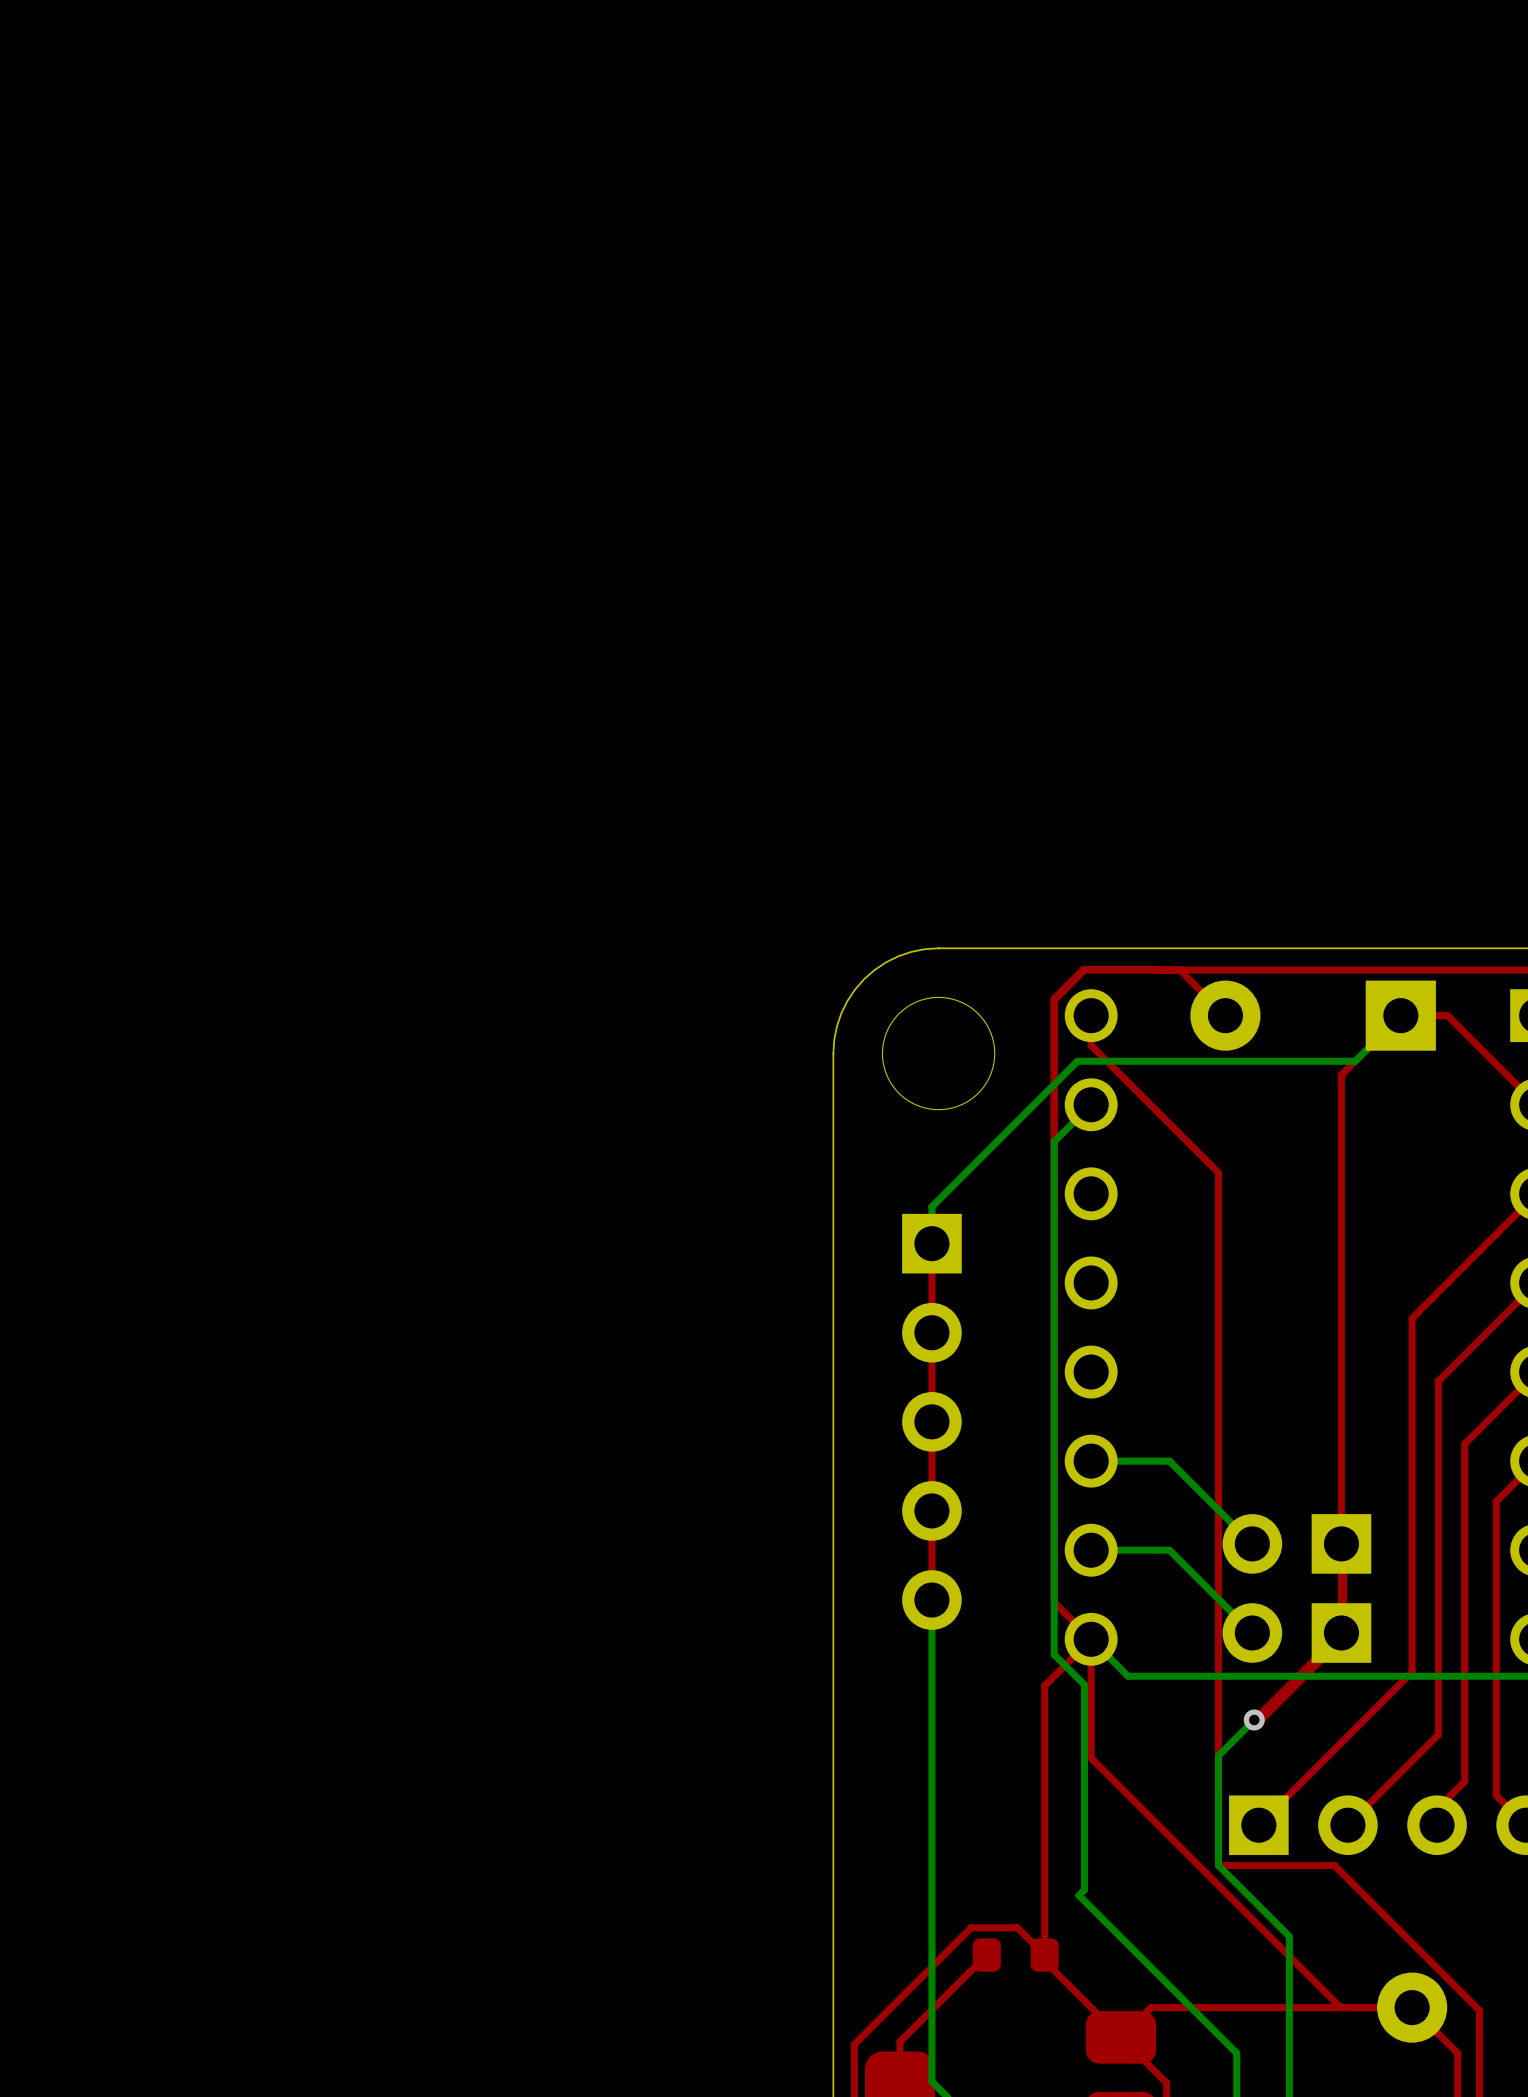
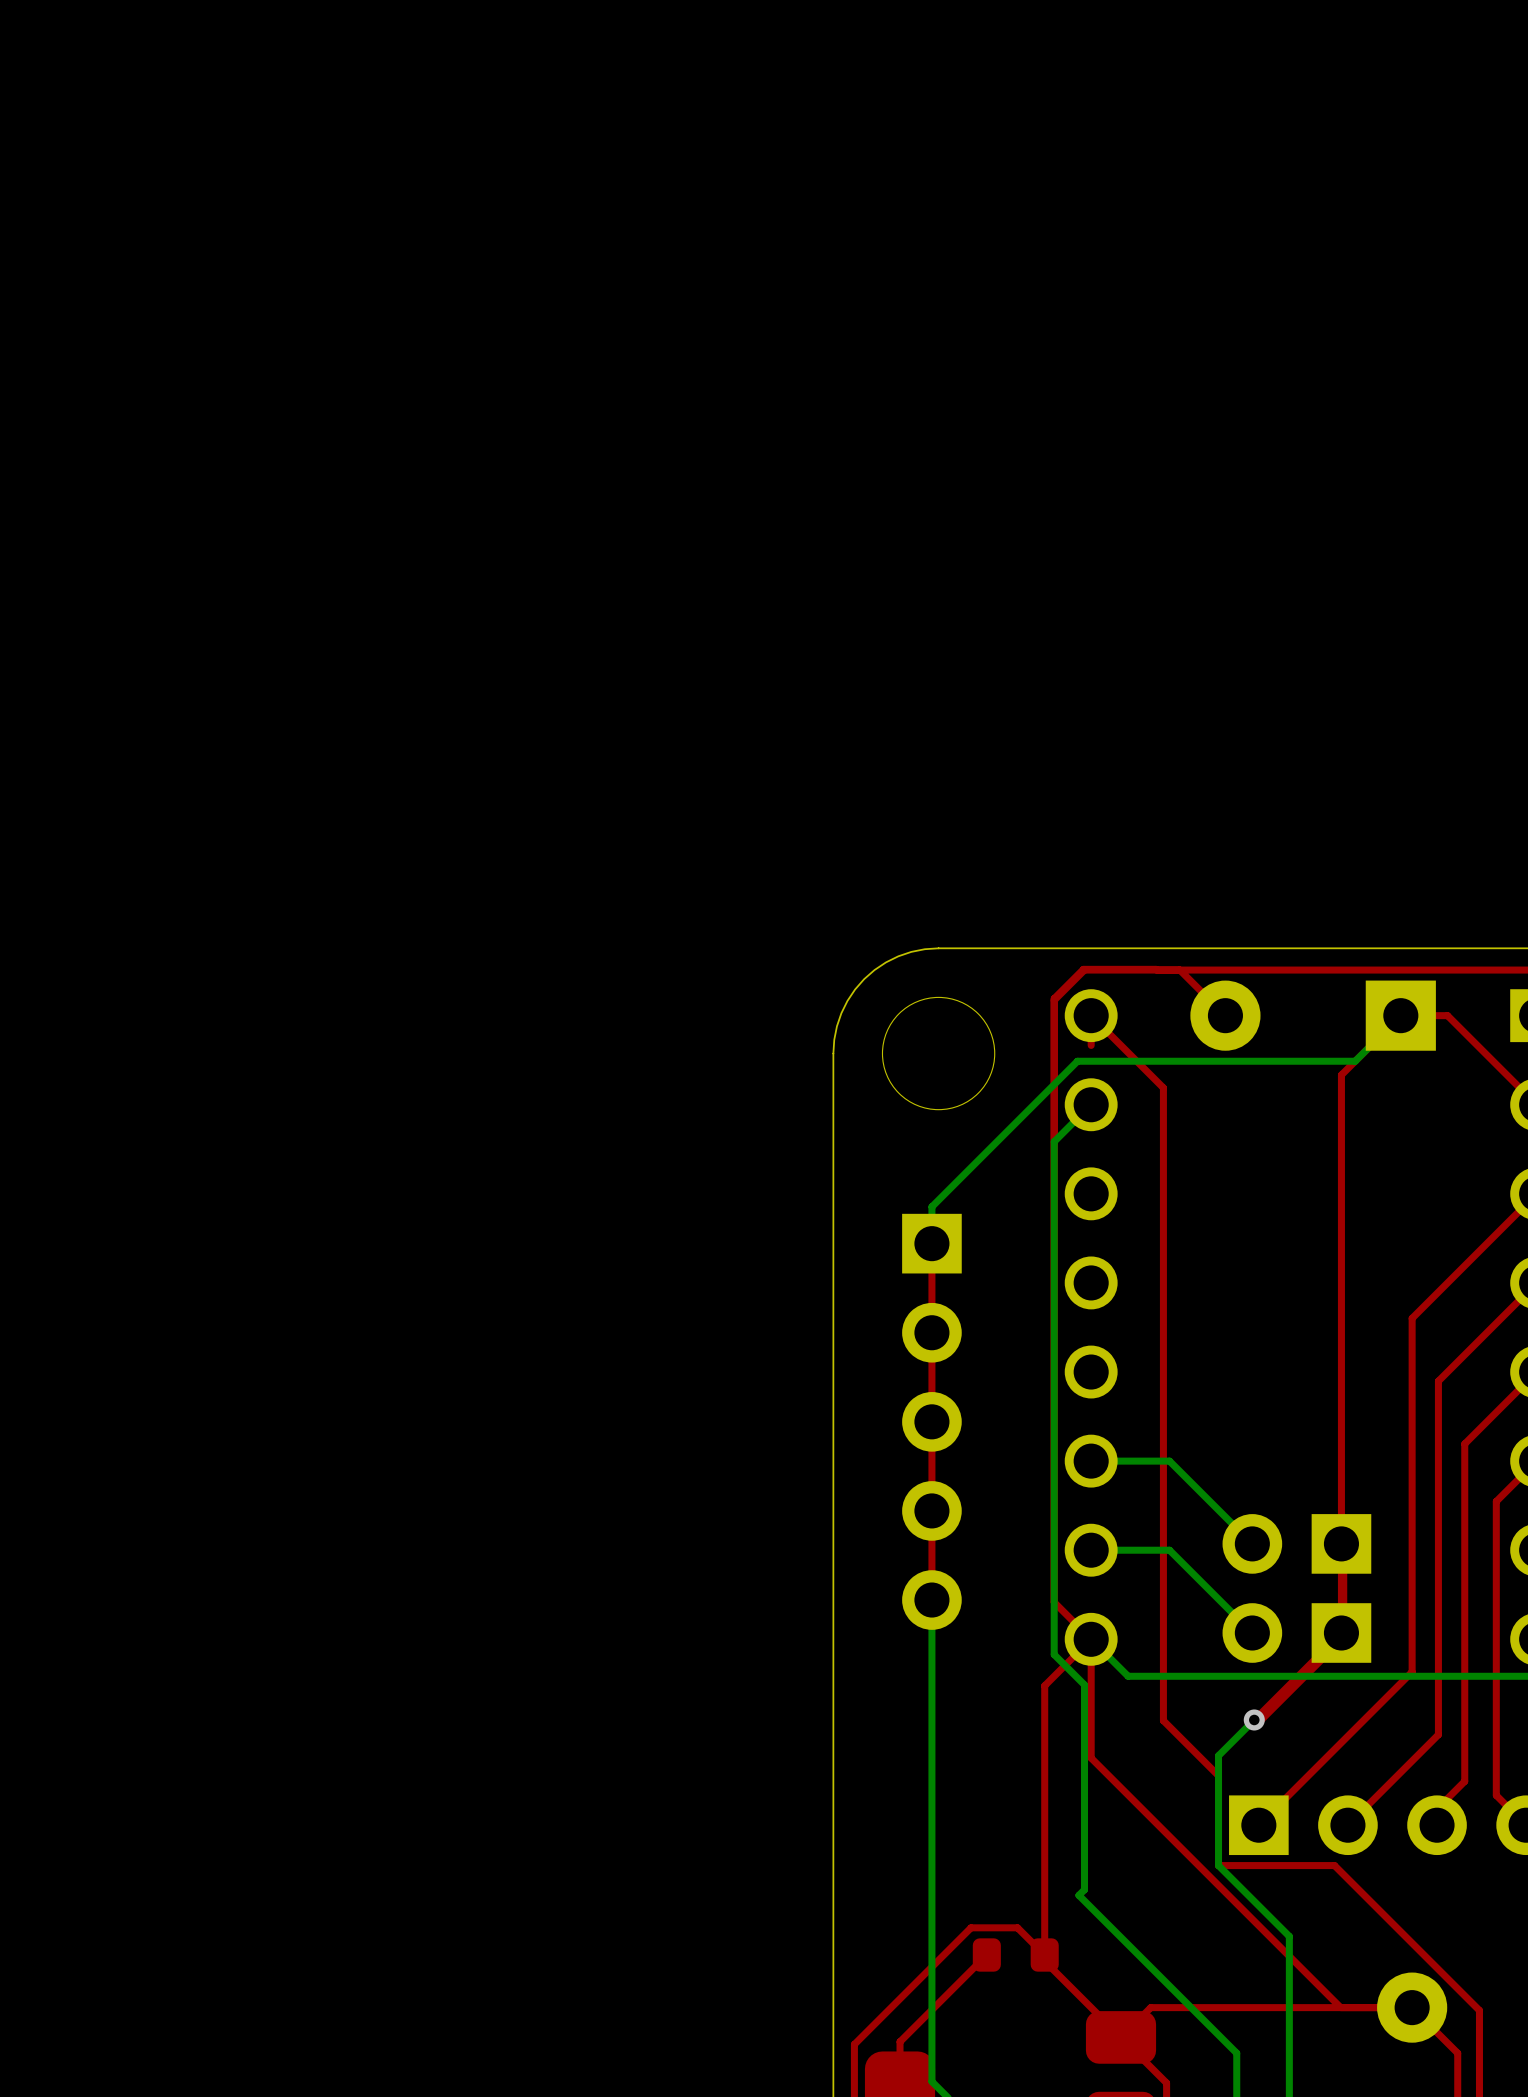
top track: (1091, 1045) (1218, 1172) (1218, 1775) -> (1091, 1015) (1163, 1087) (1163, 1720) (1218, 1775)

